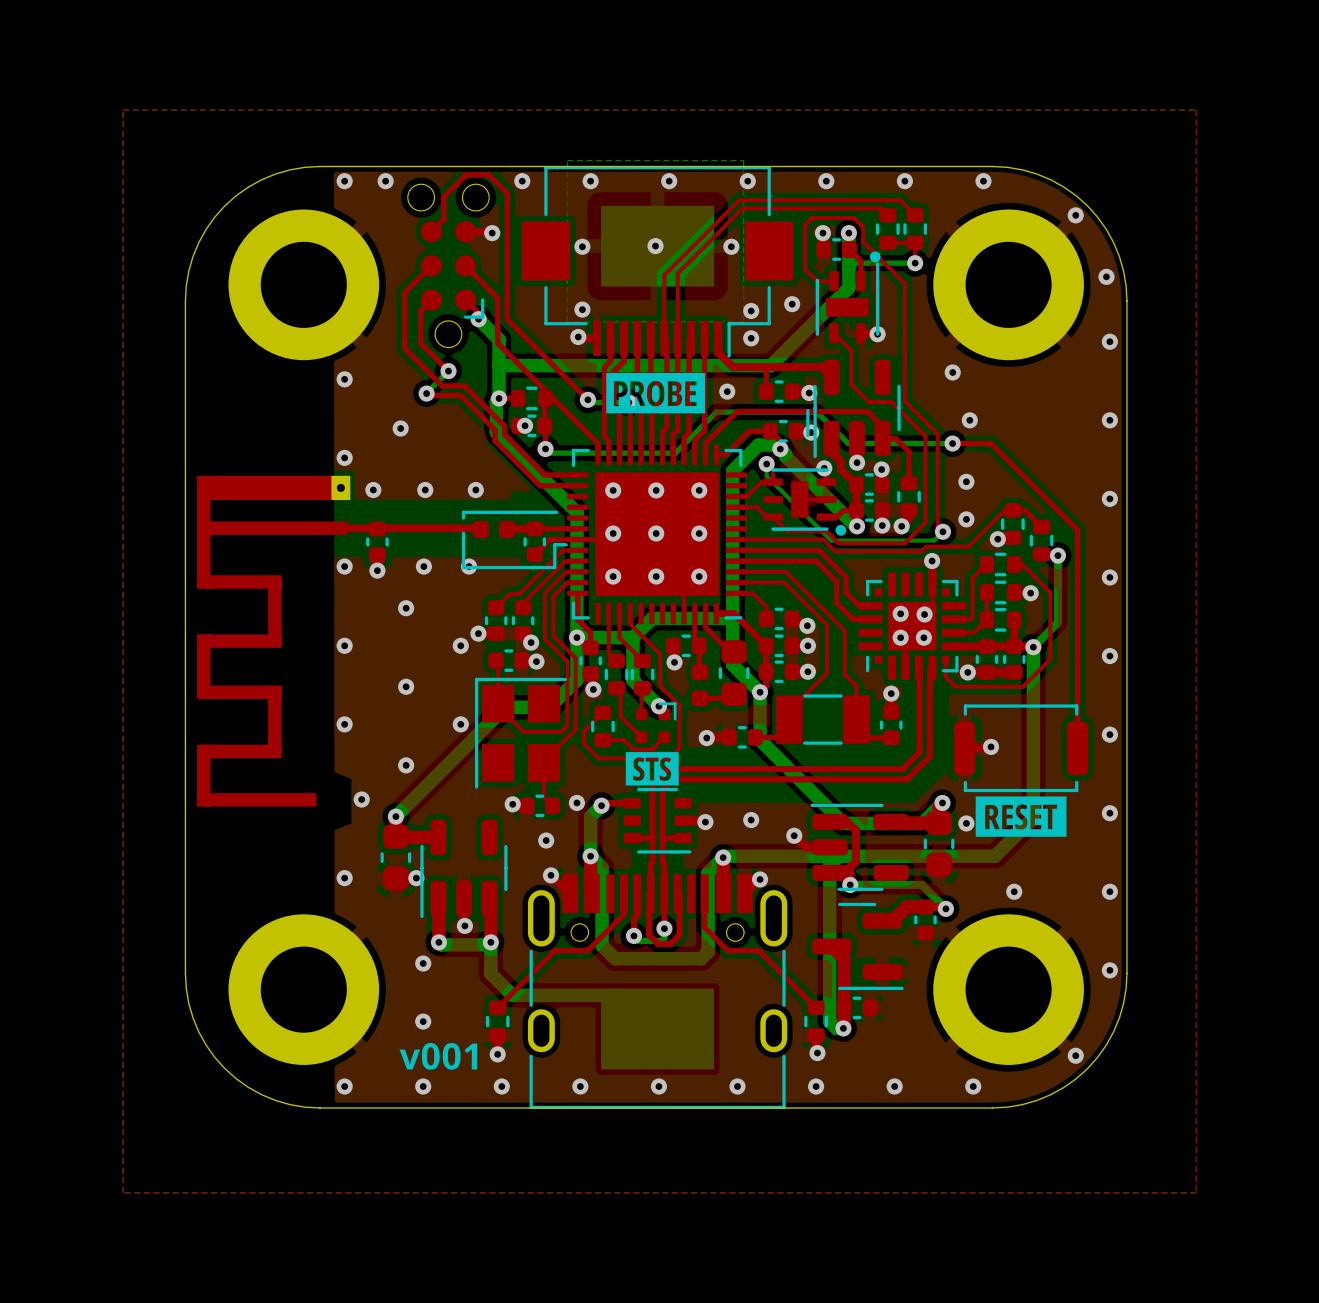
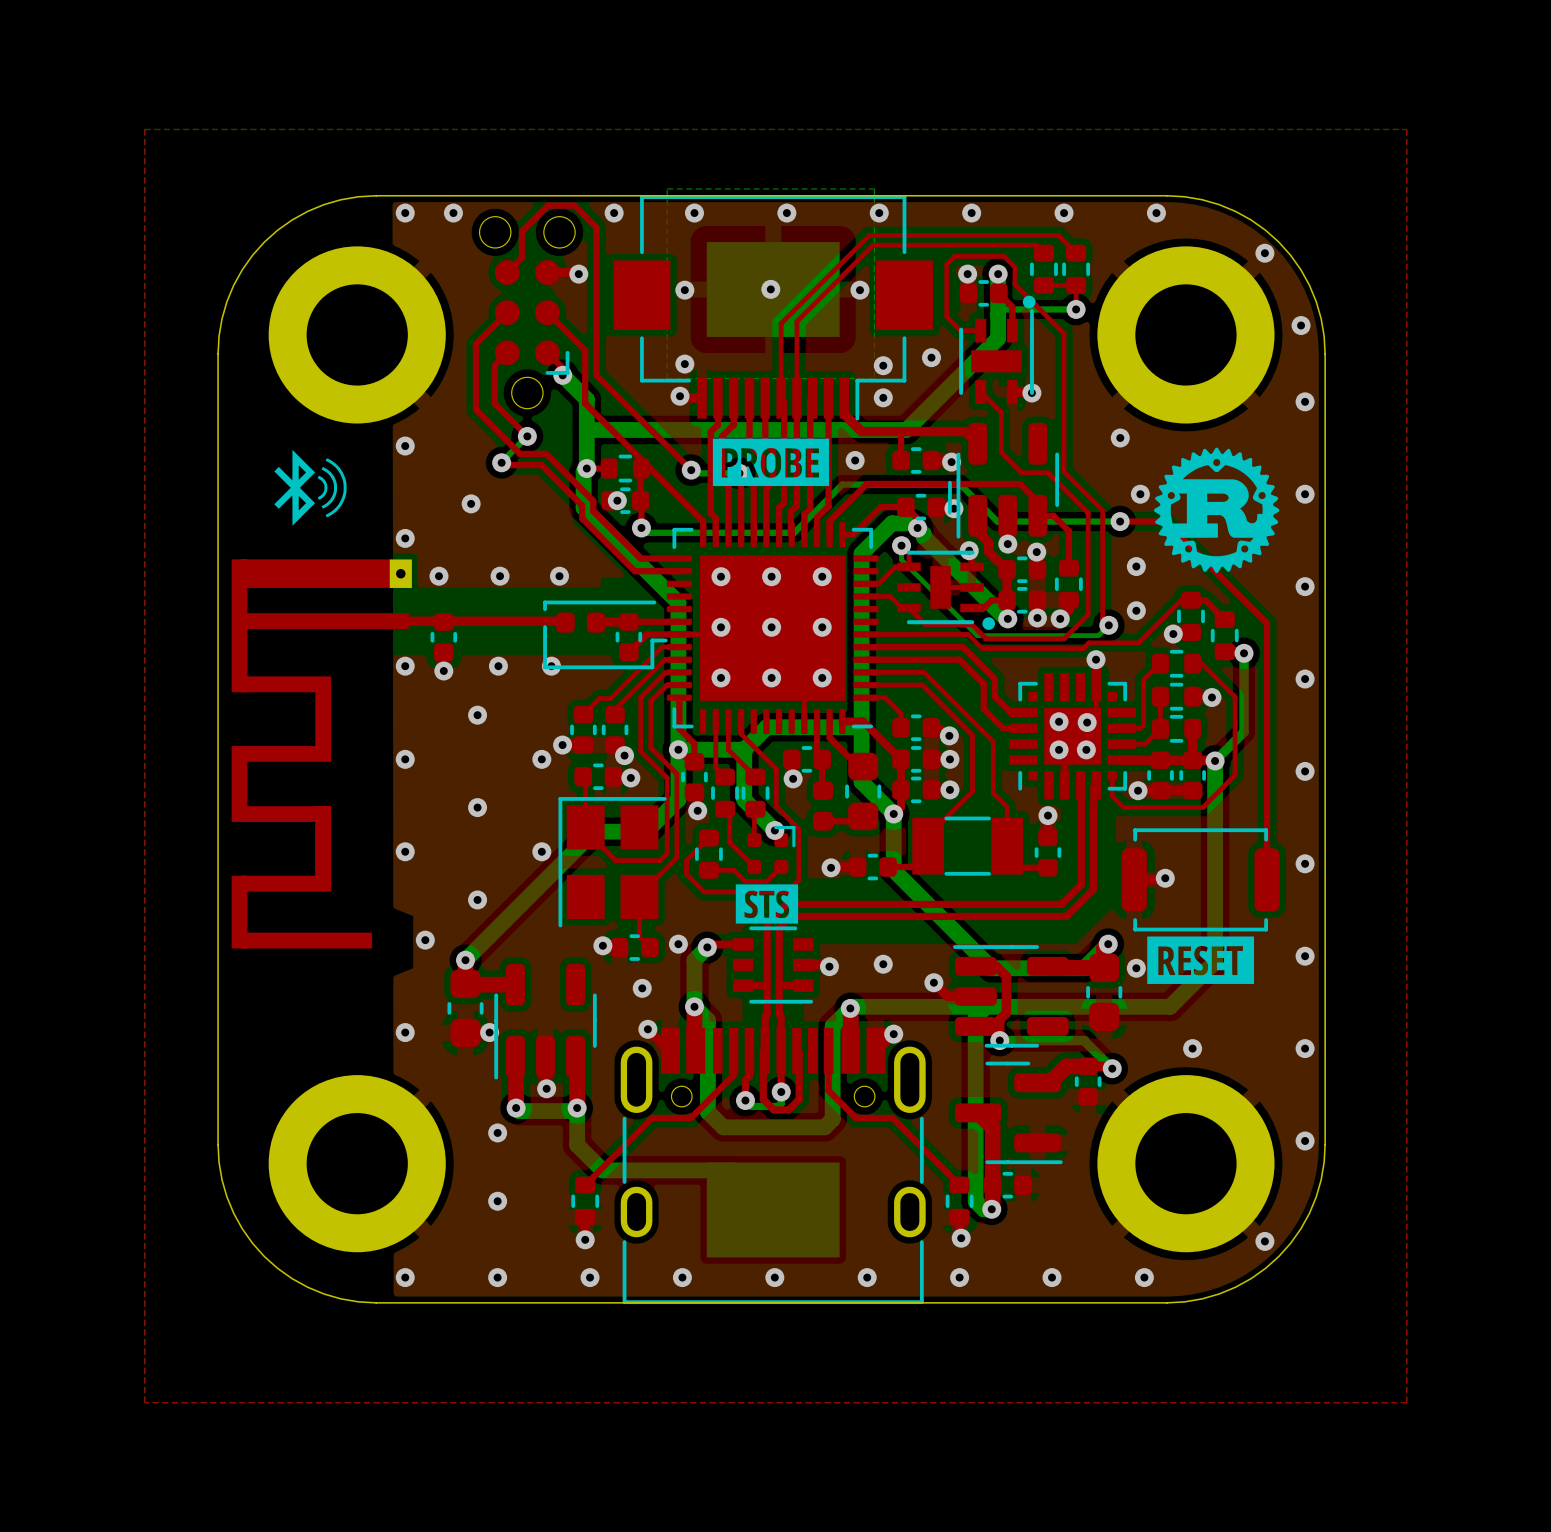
drawing: none -> [1154, 447, 1280, 573]
drawing: none -> [274, 449, 347, 526]
drawing: [399, 1042, 478, 1070] -> none

